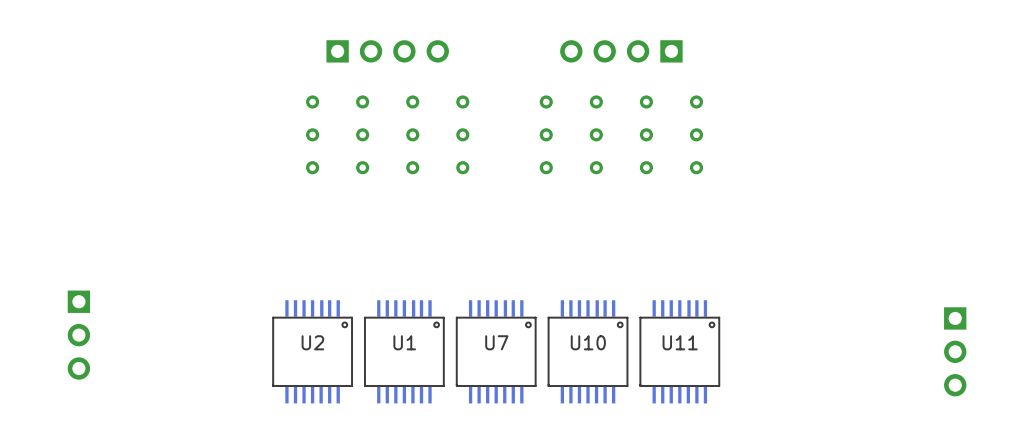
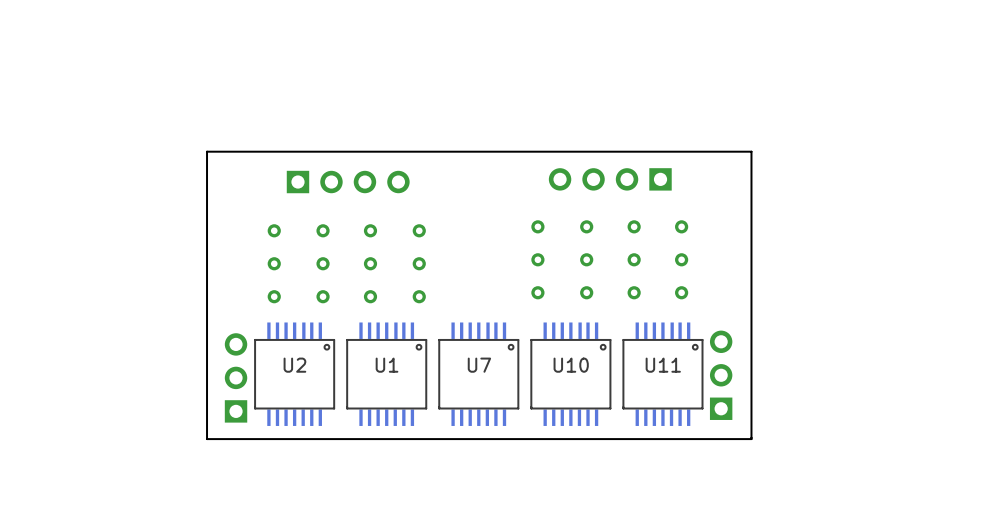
part position: (387, 51) -> (348, 182)
part position: (621, 51) -> (610, 179)
board edge: none -> (751, 151) (751, 439) (207, 439) (207, 151) (751, 151)
part: (312, 134) -> none
part: (362, 134) -> none
part: (412, 134) -> none
part: (462, 134) -> none
part: (546, 134) -> none
part: (596, 134) -> none
part: (646, 134) -> none
part: (696, 134) -> none
part: none -> (537, 259)
part: none -> (586, 259)
part: none -> (634, 259)
part: none -> (681, 259)
part: none -> (274, 263)
part: none -> (323, 263)
part: none -> (370, 263)
part: none -> (419, 263)
part rotation: 0° (78, 335) -> 180° (236, 377)
part position: (78, 335) -> (236, 377)
part rotation: 0° (955, 351) -> 180° (721, 375)
part position: (955, 351) -> (721, 375)

